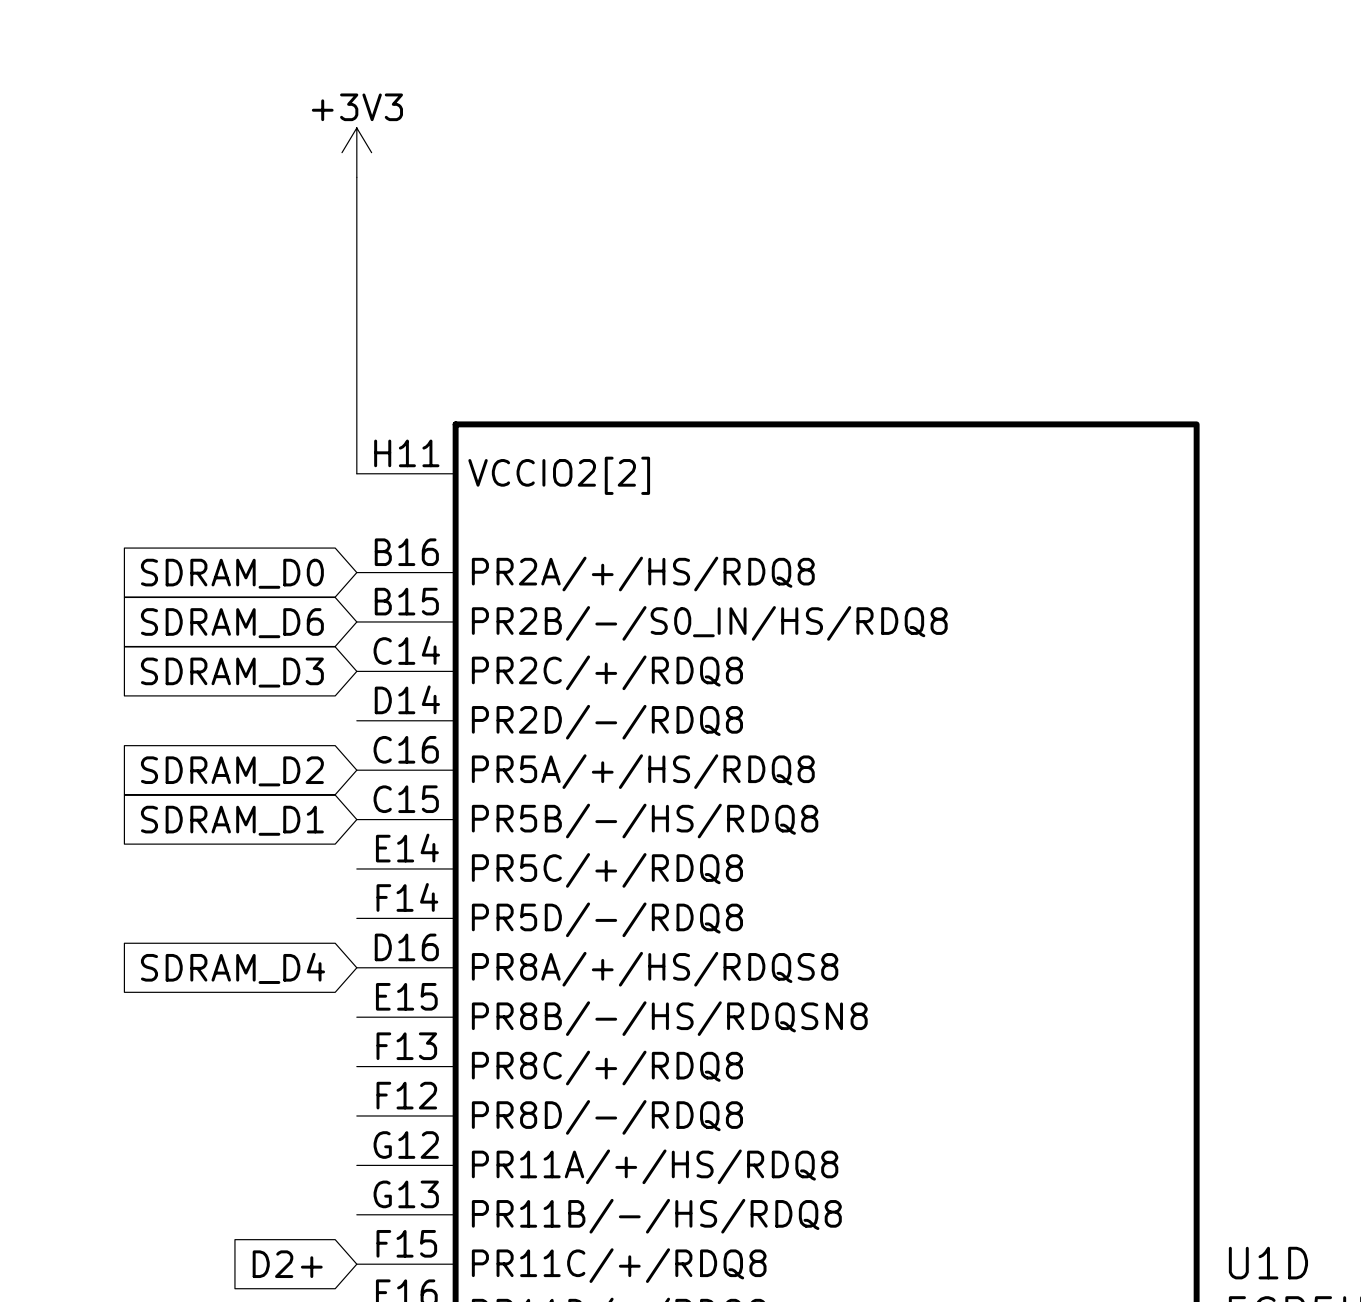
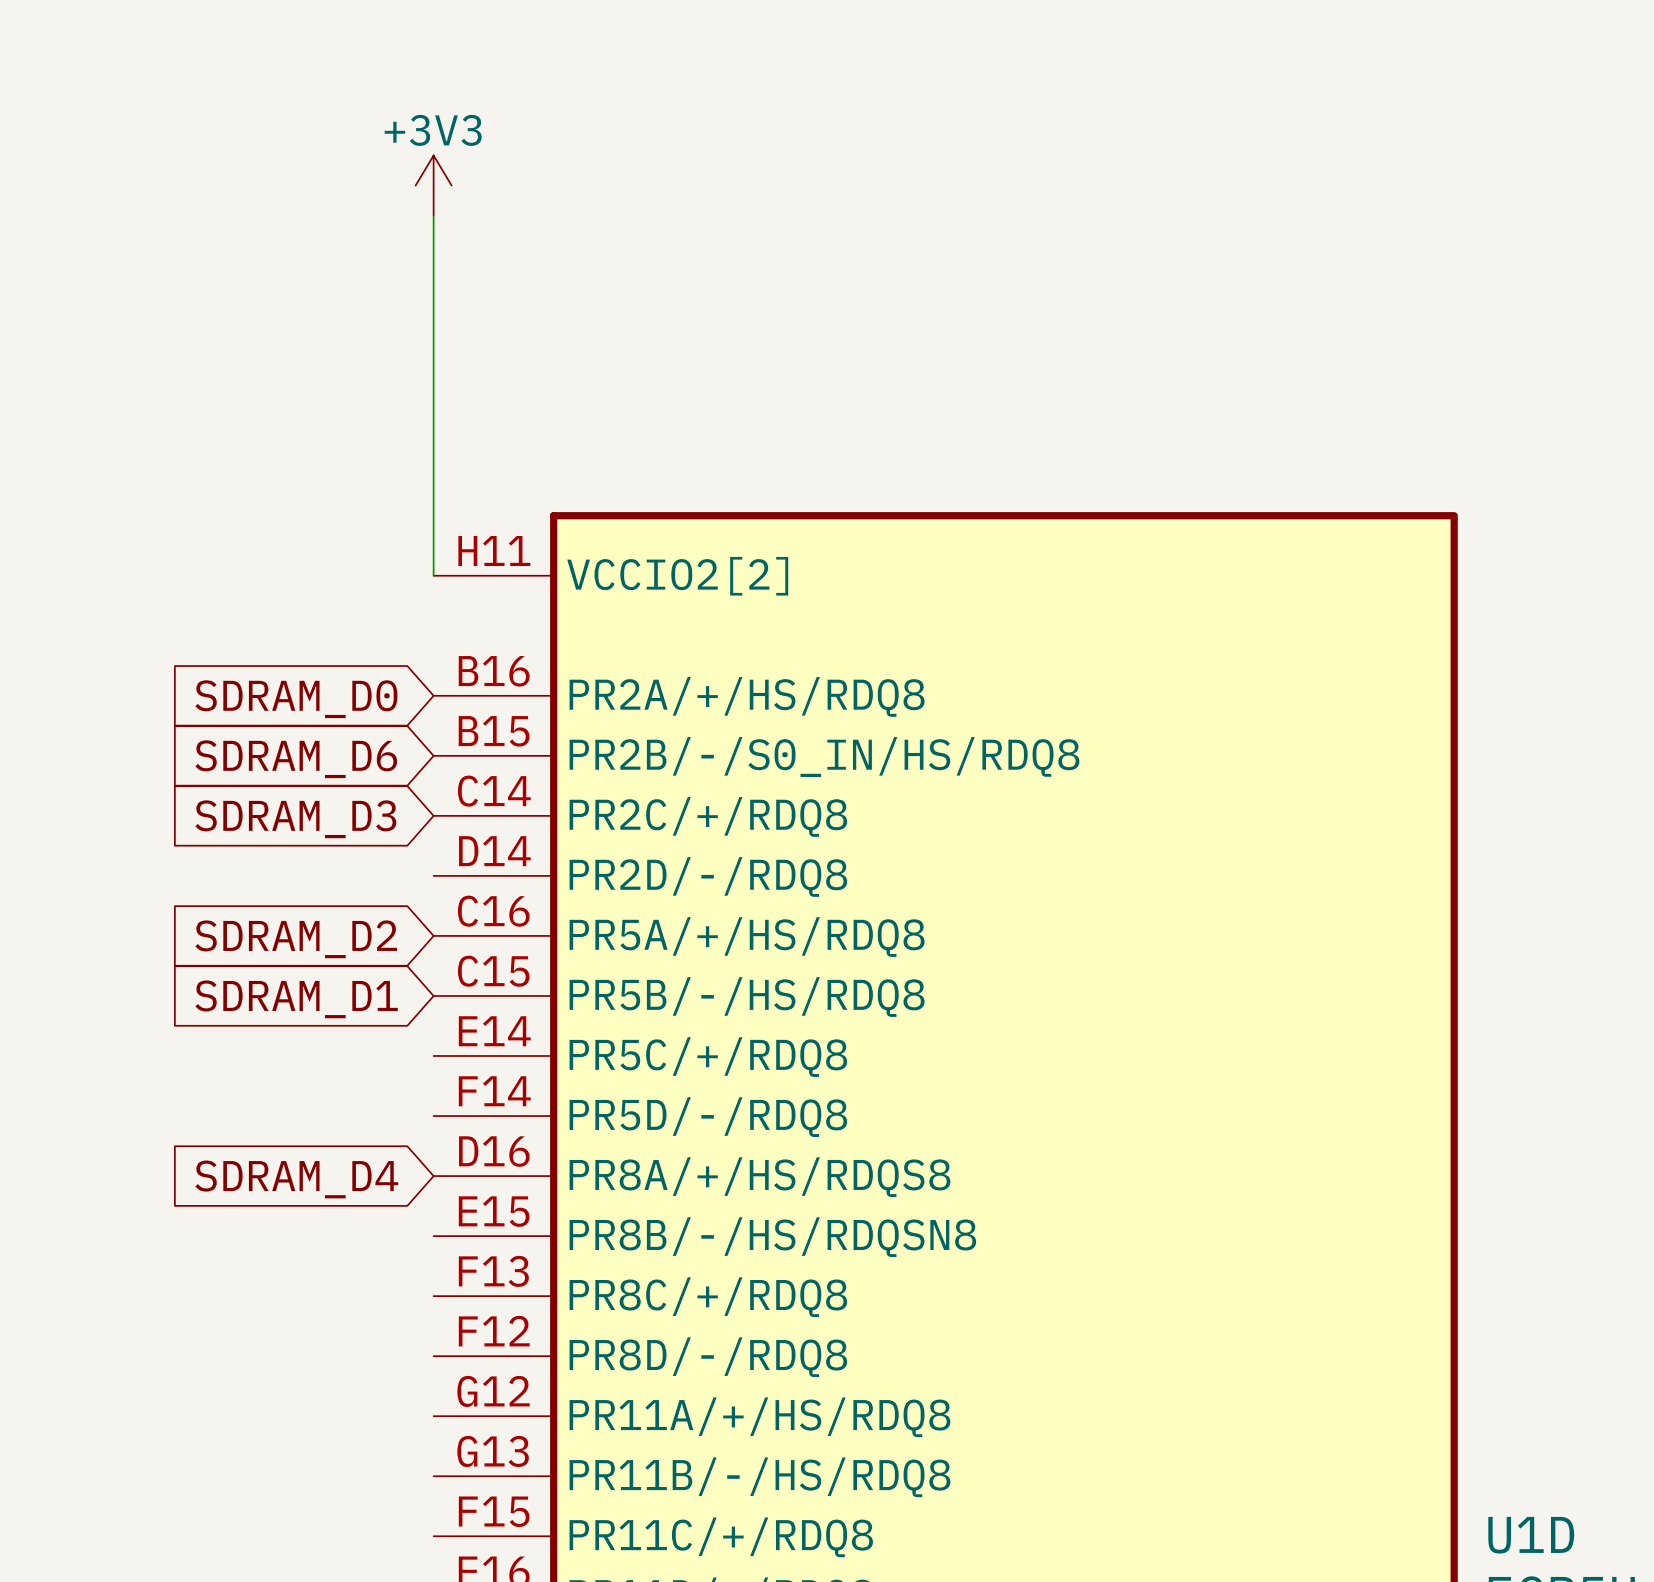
global label: D2+ (287, 1264) -> none

